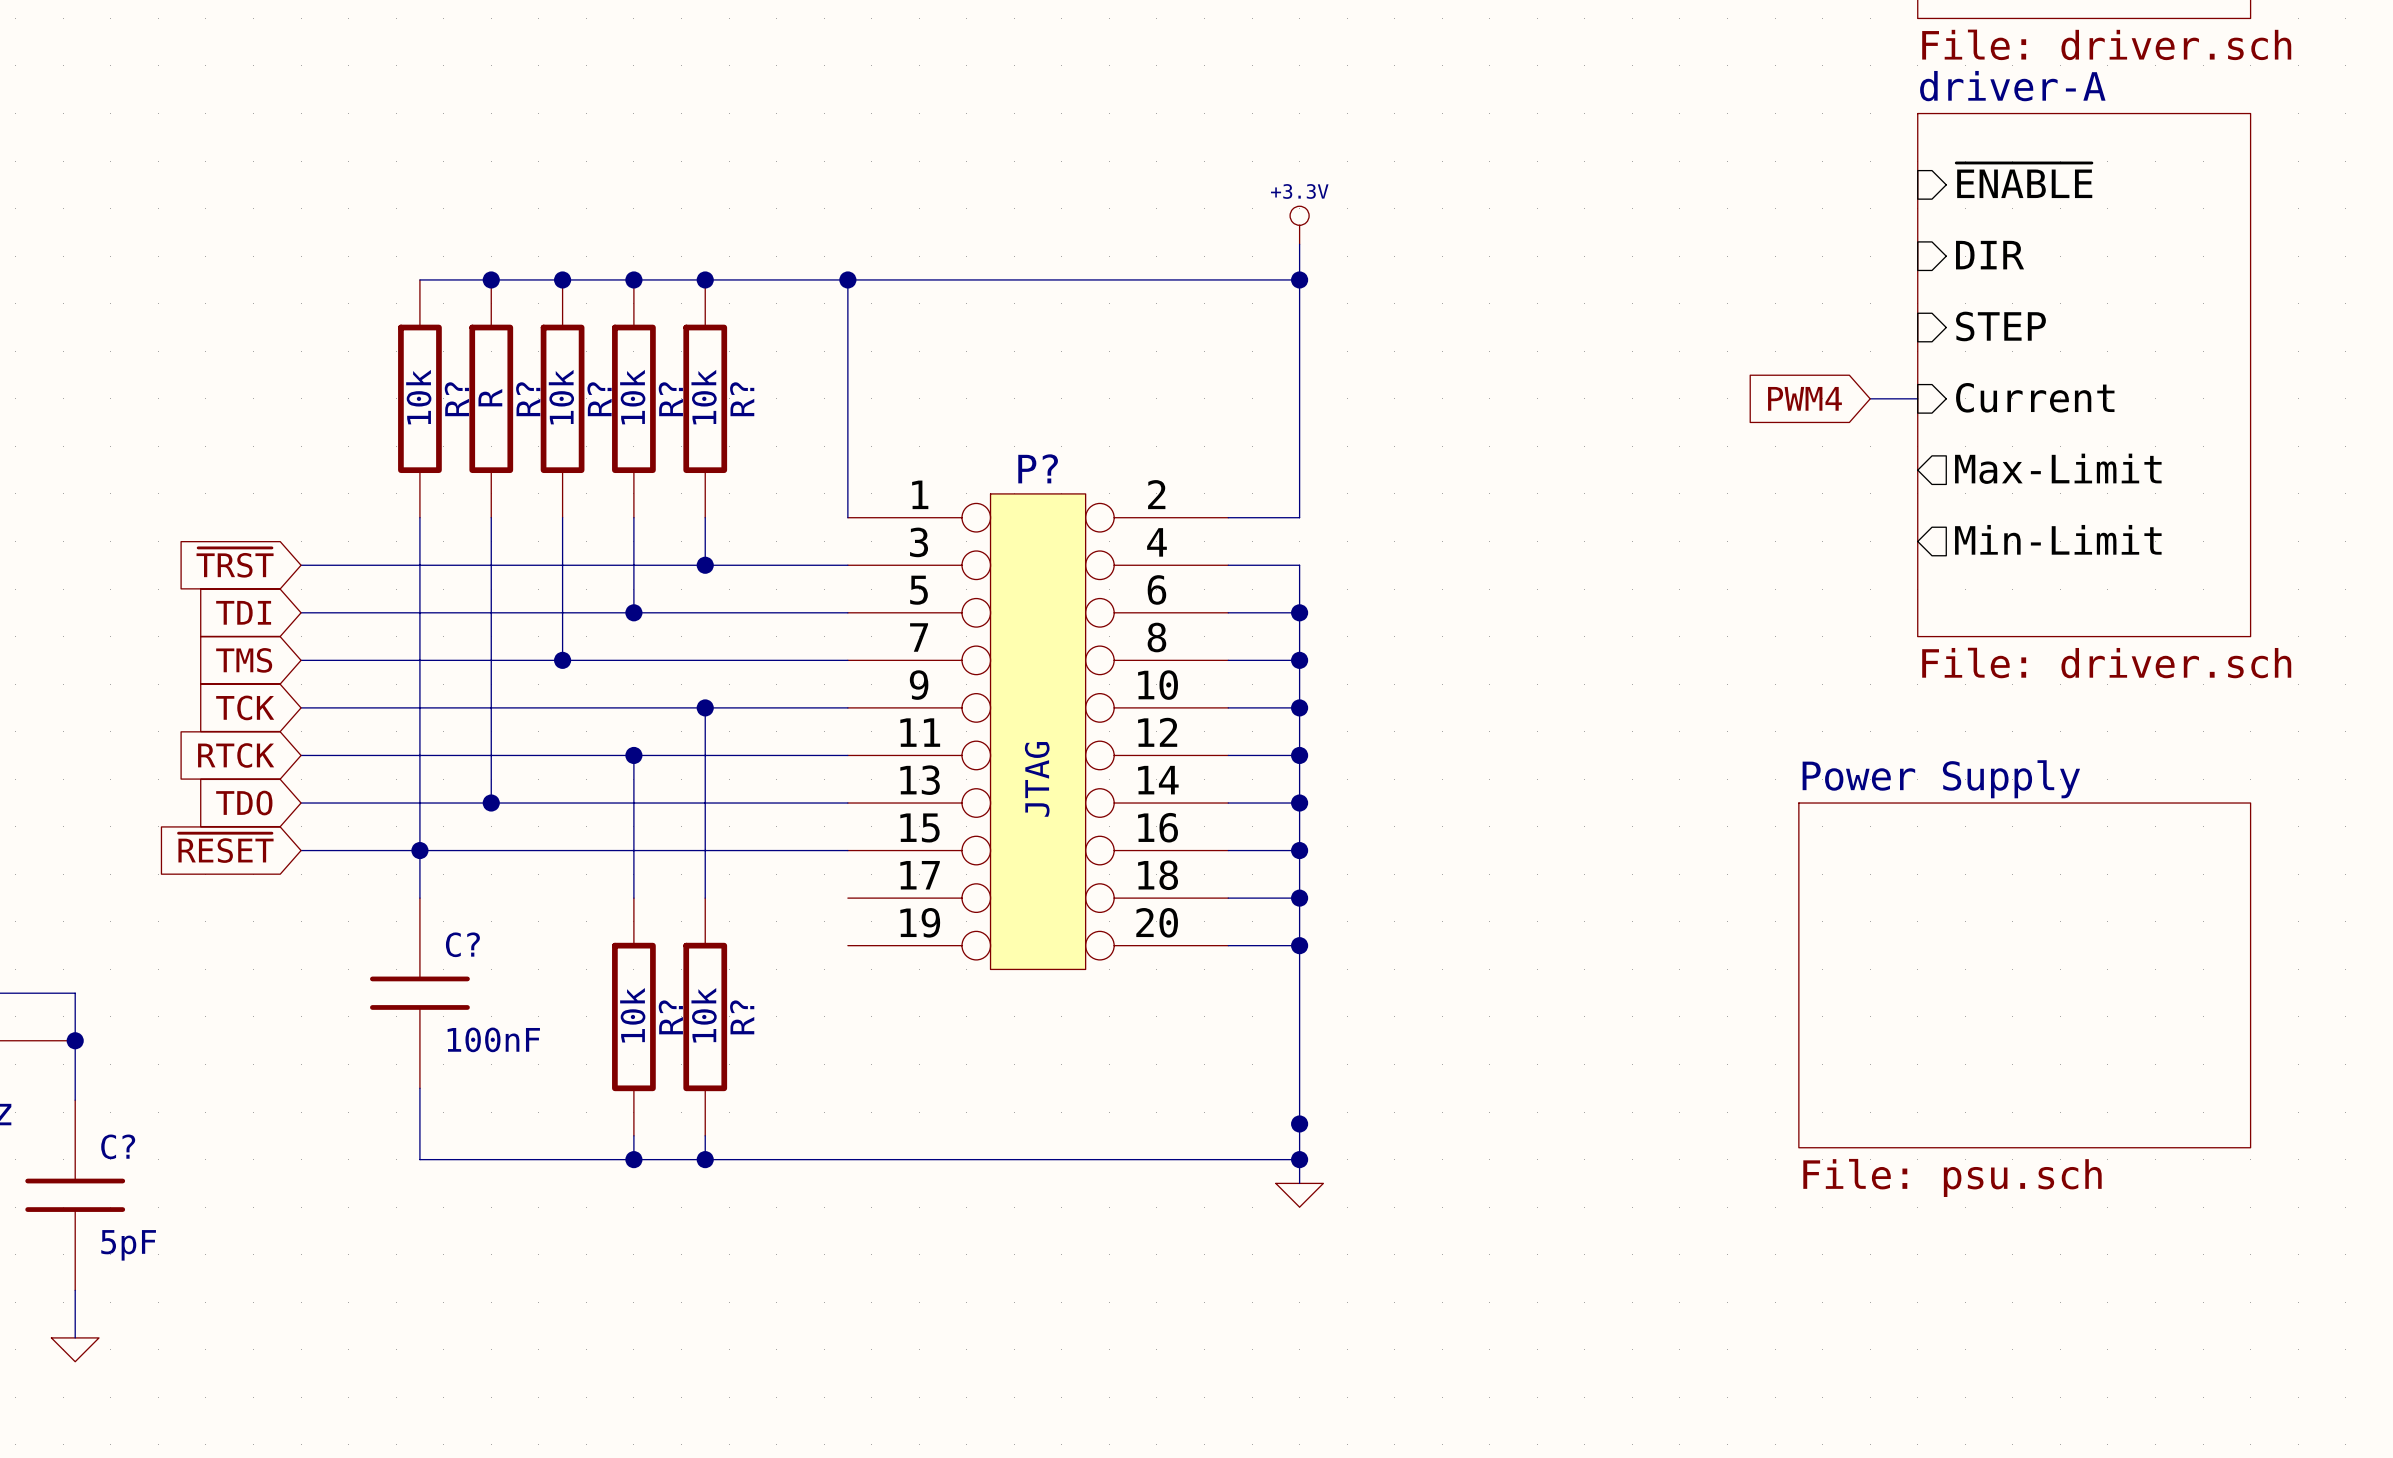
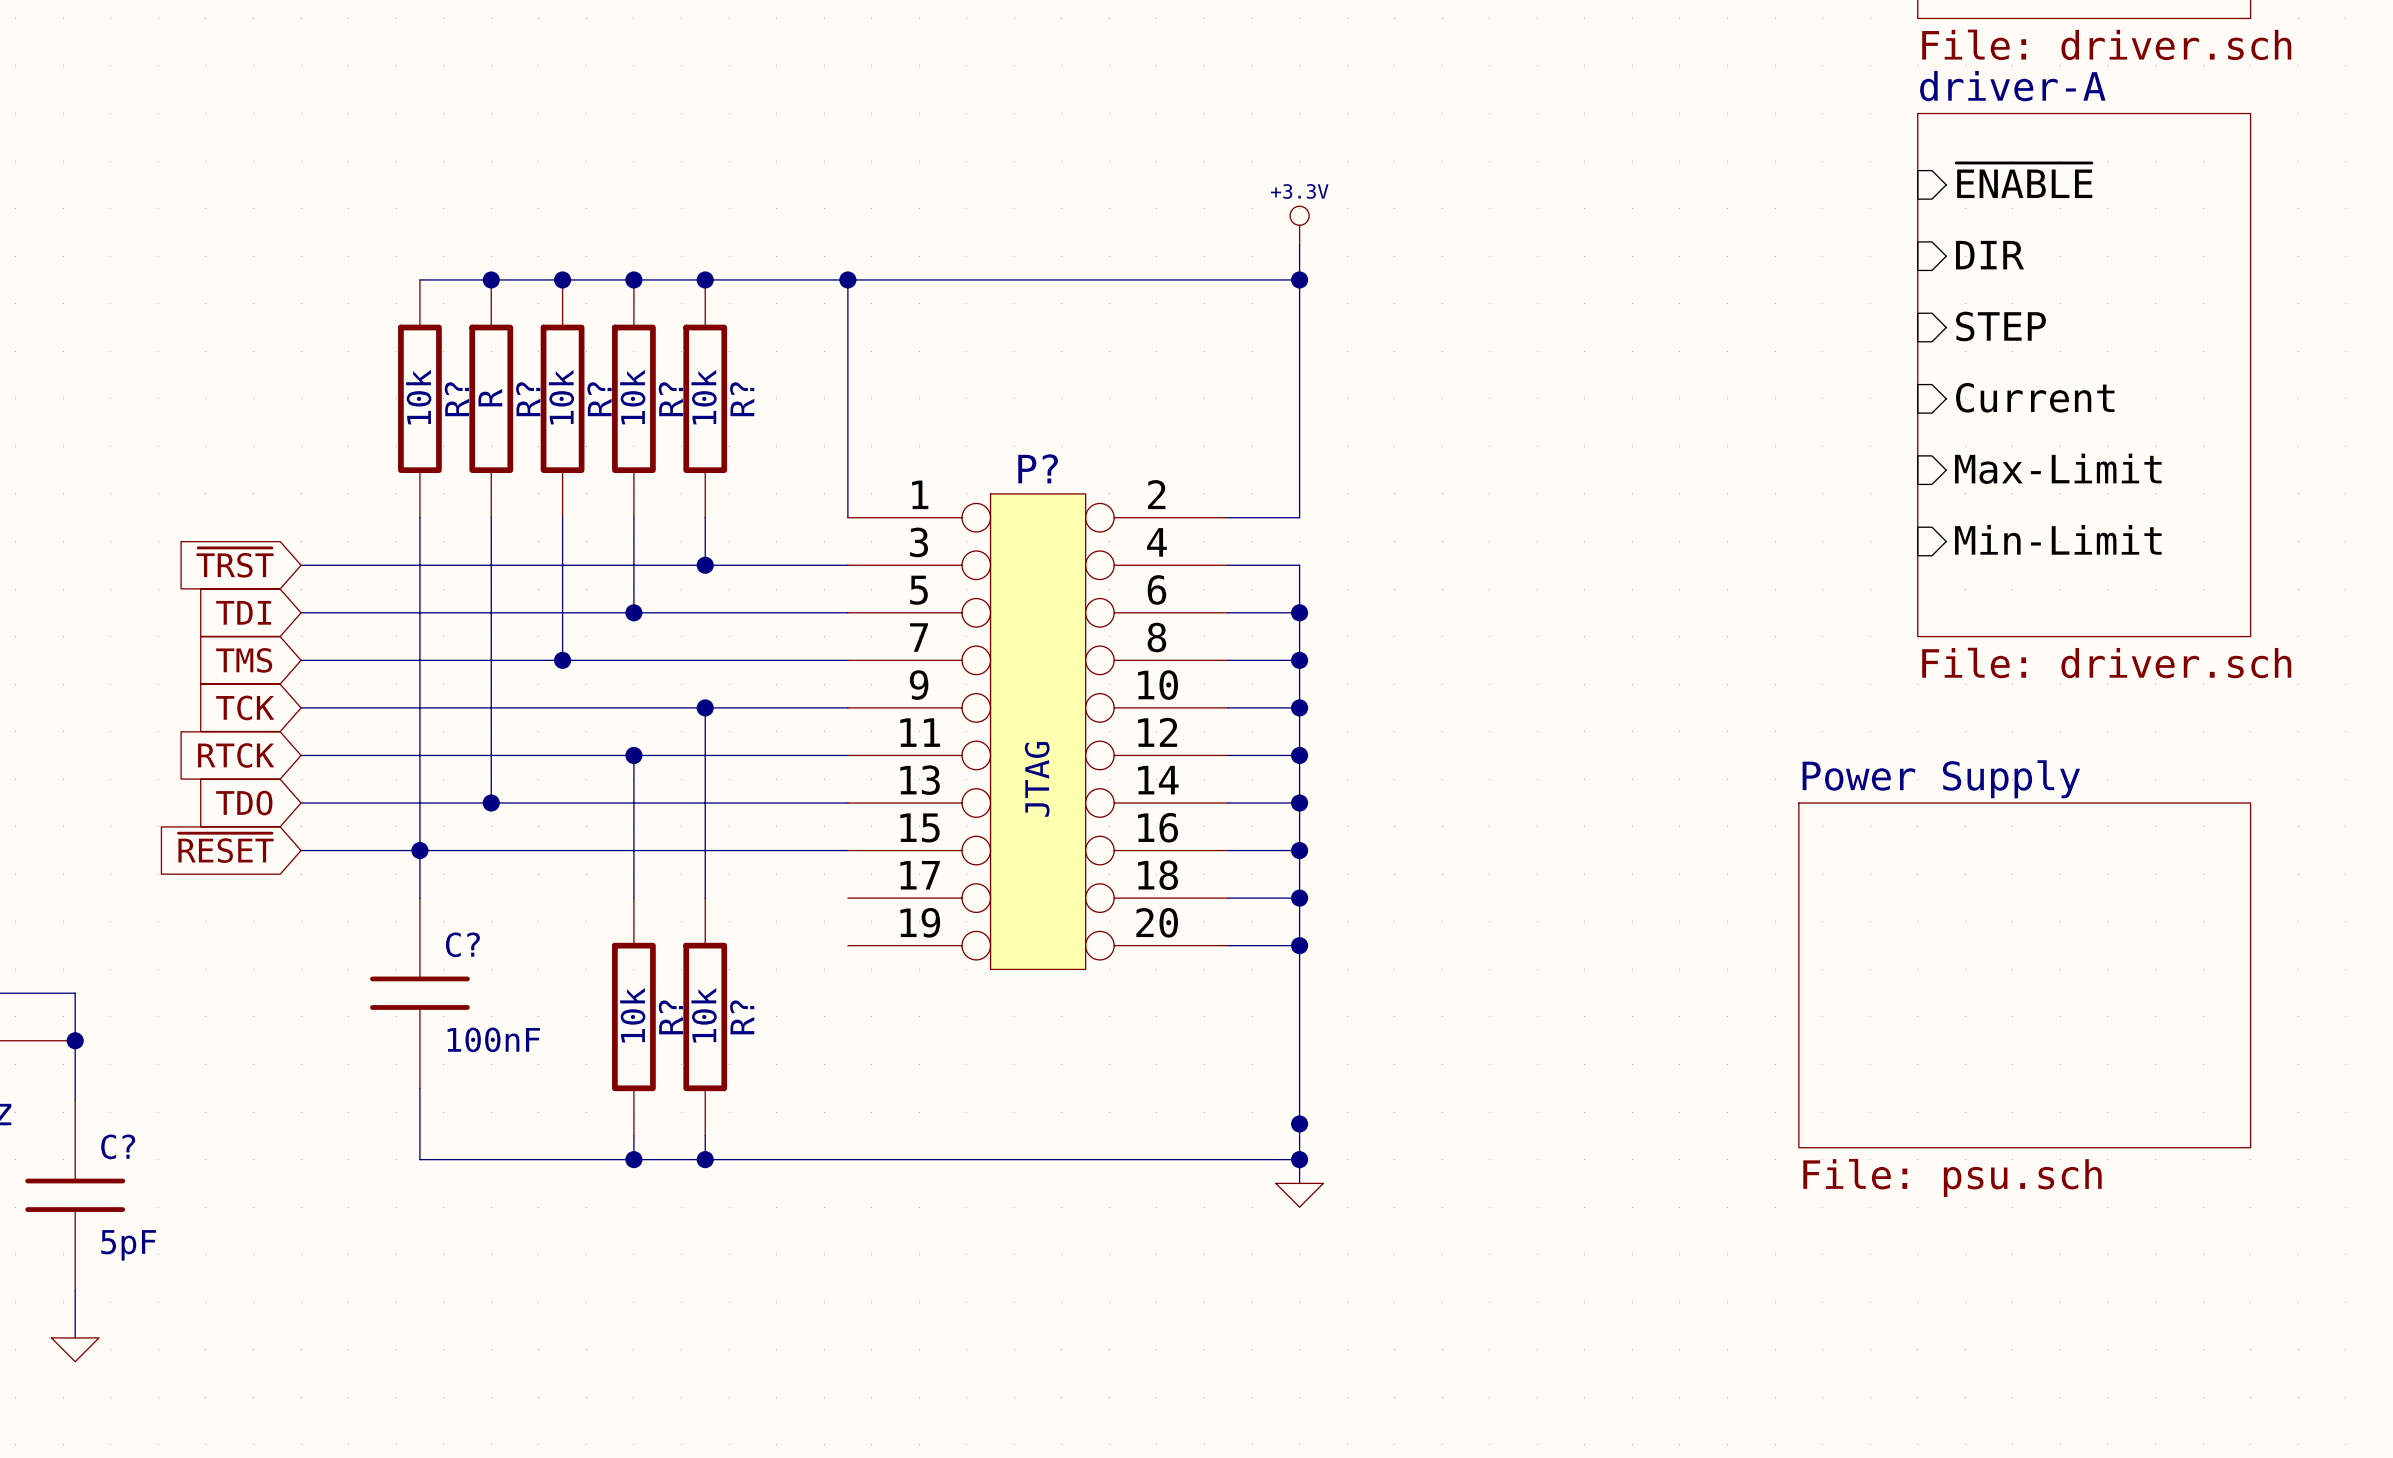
global label: PWM4 (1804, 398) -> none
wire: (1870, 398) (1917, 398) -> none
sheet pin shape: output (2058, 468) -> input (2058, 468)
sheet pin shape: output (2058, 539) -> input (2058, 539)

